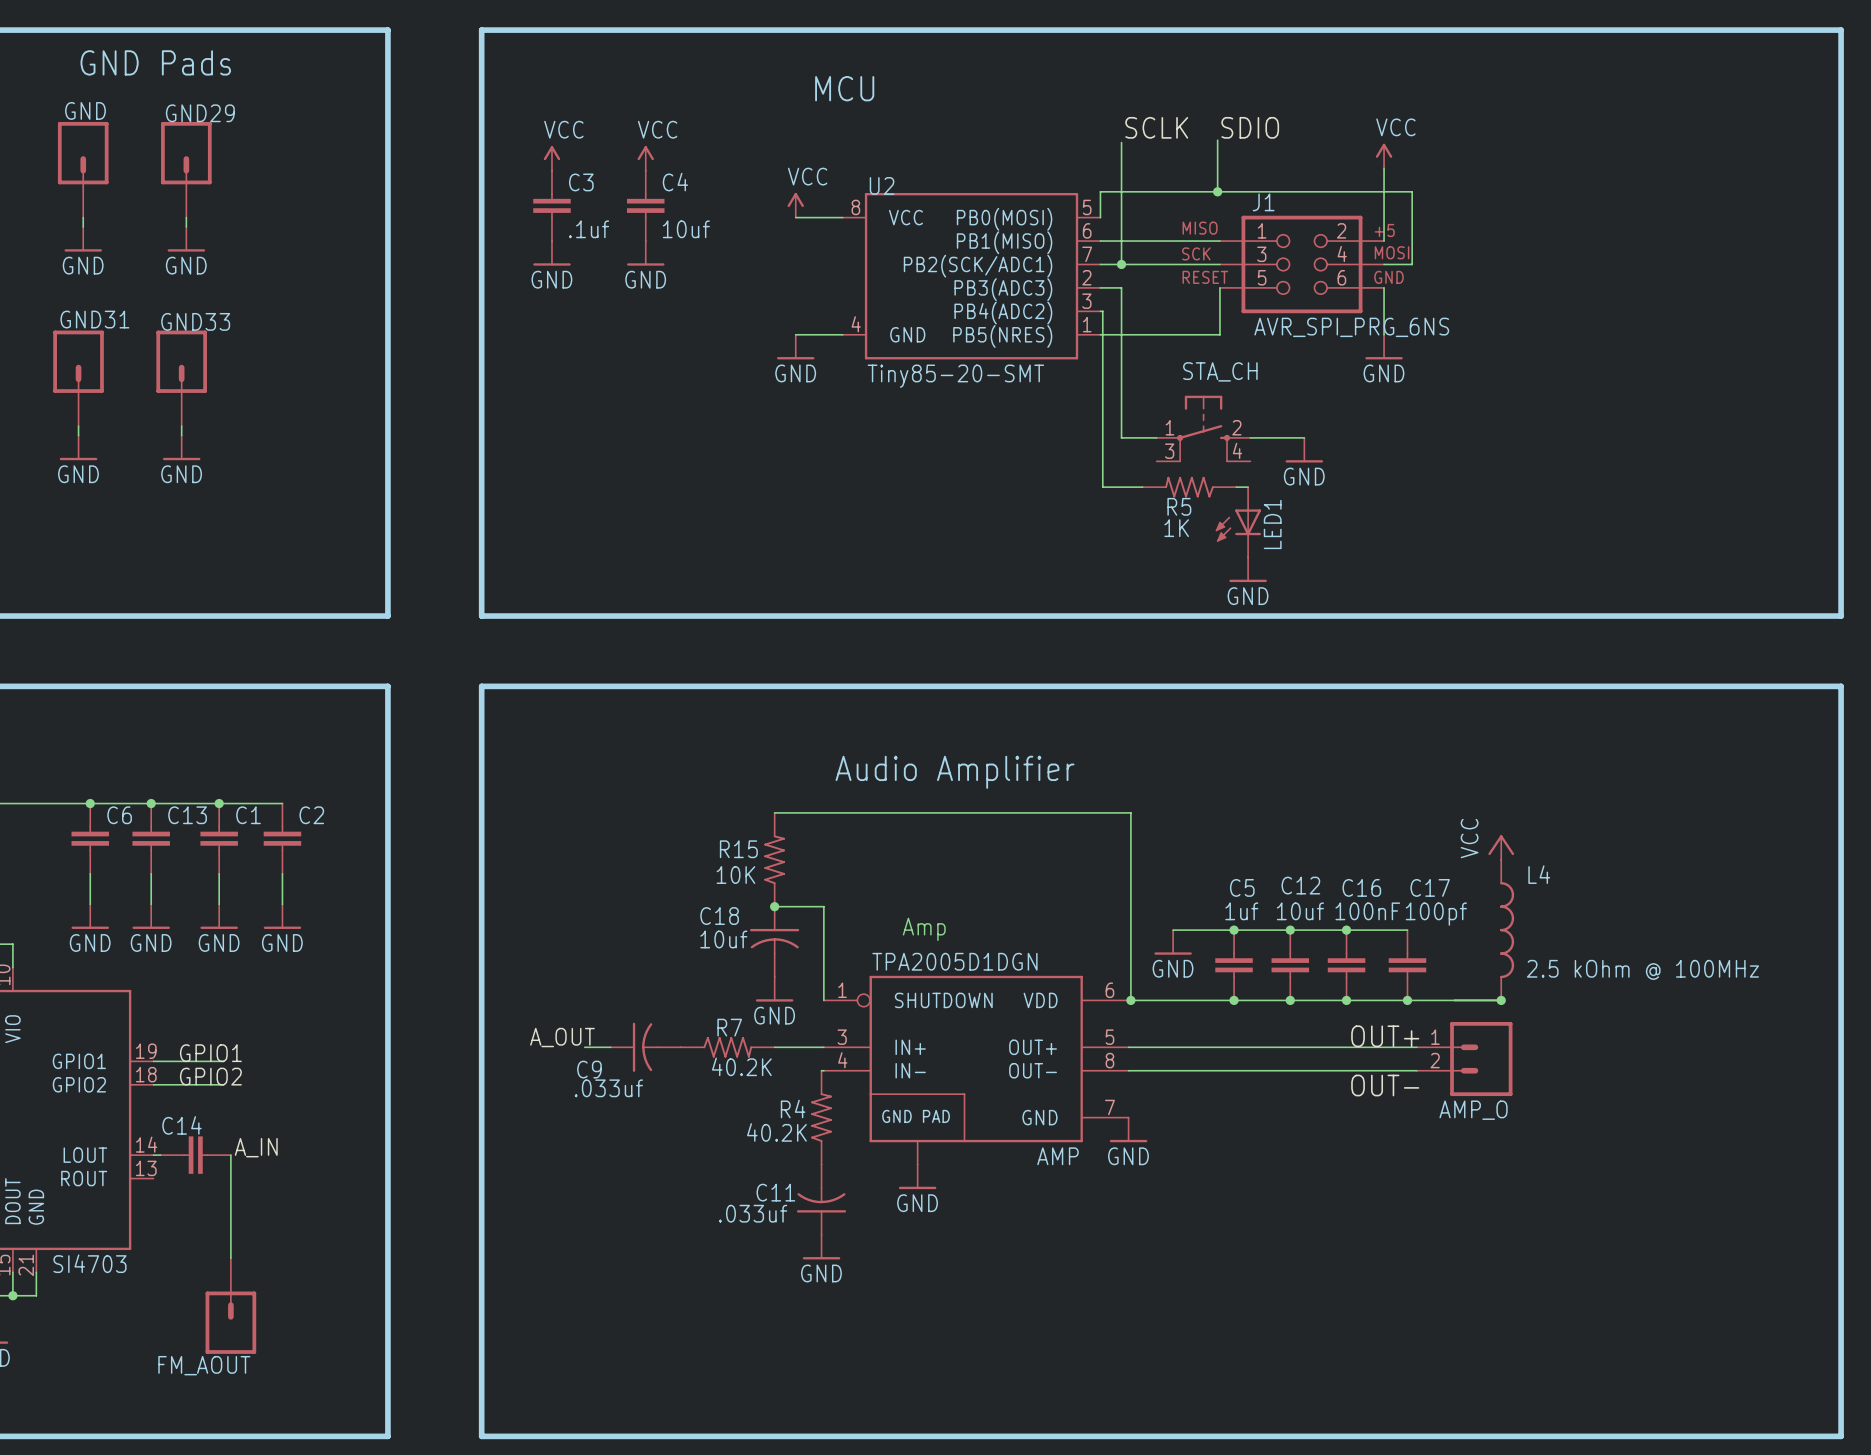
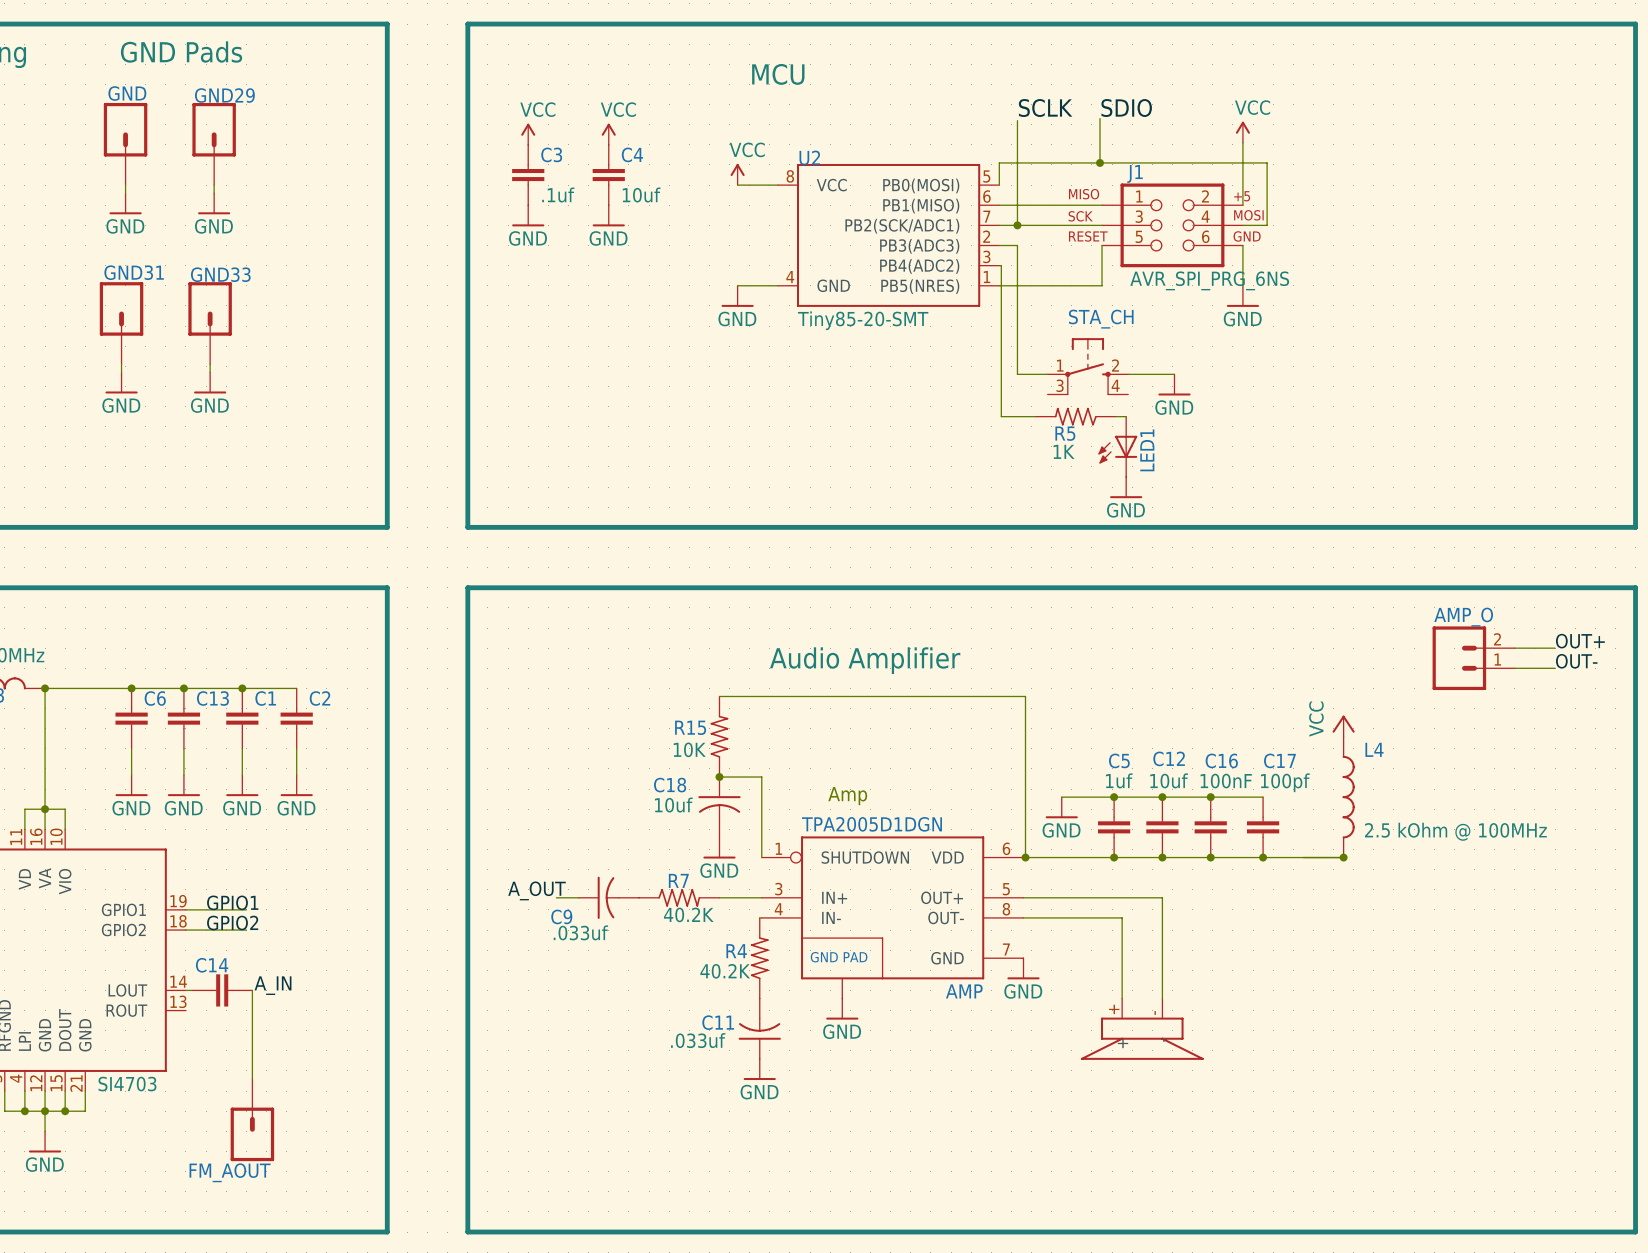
label: none -> OUT+ (1580, 641)
wire: none -> (1514, 648) (1555, 648)
AMP_O: none -> (1473, 658)
label: none -> OUT- (1576, 661)
wire: none -> (1514, 668) (1555, 668)
label: OUT+ (1385, 1036) -> none
wire: (1290, 1047) (1416, 1047) -> (1162, 897) (1162, 998)
AMP_O: (1464, 1059) -> none
wire: (1243, 1070) (1416, 1070) -> (1122, 917) (1122, 998)
label: OUT- (1385, 1085) -> none
part: none -> (1142, 1029)

